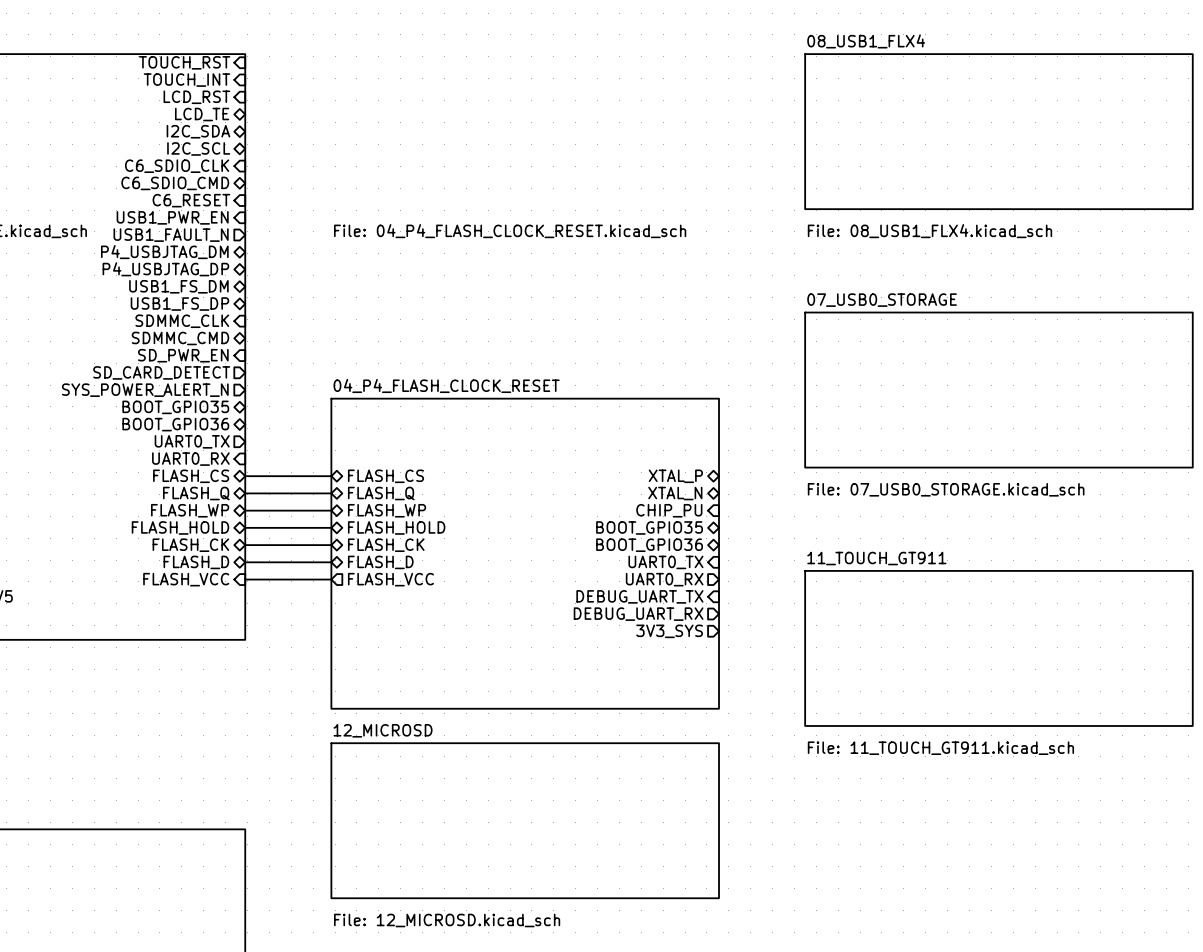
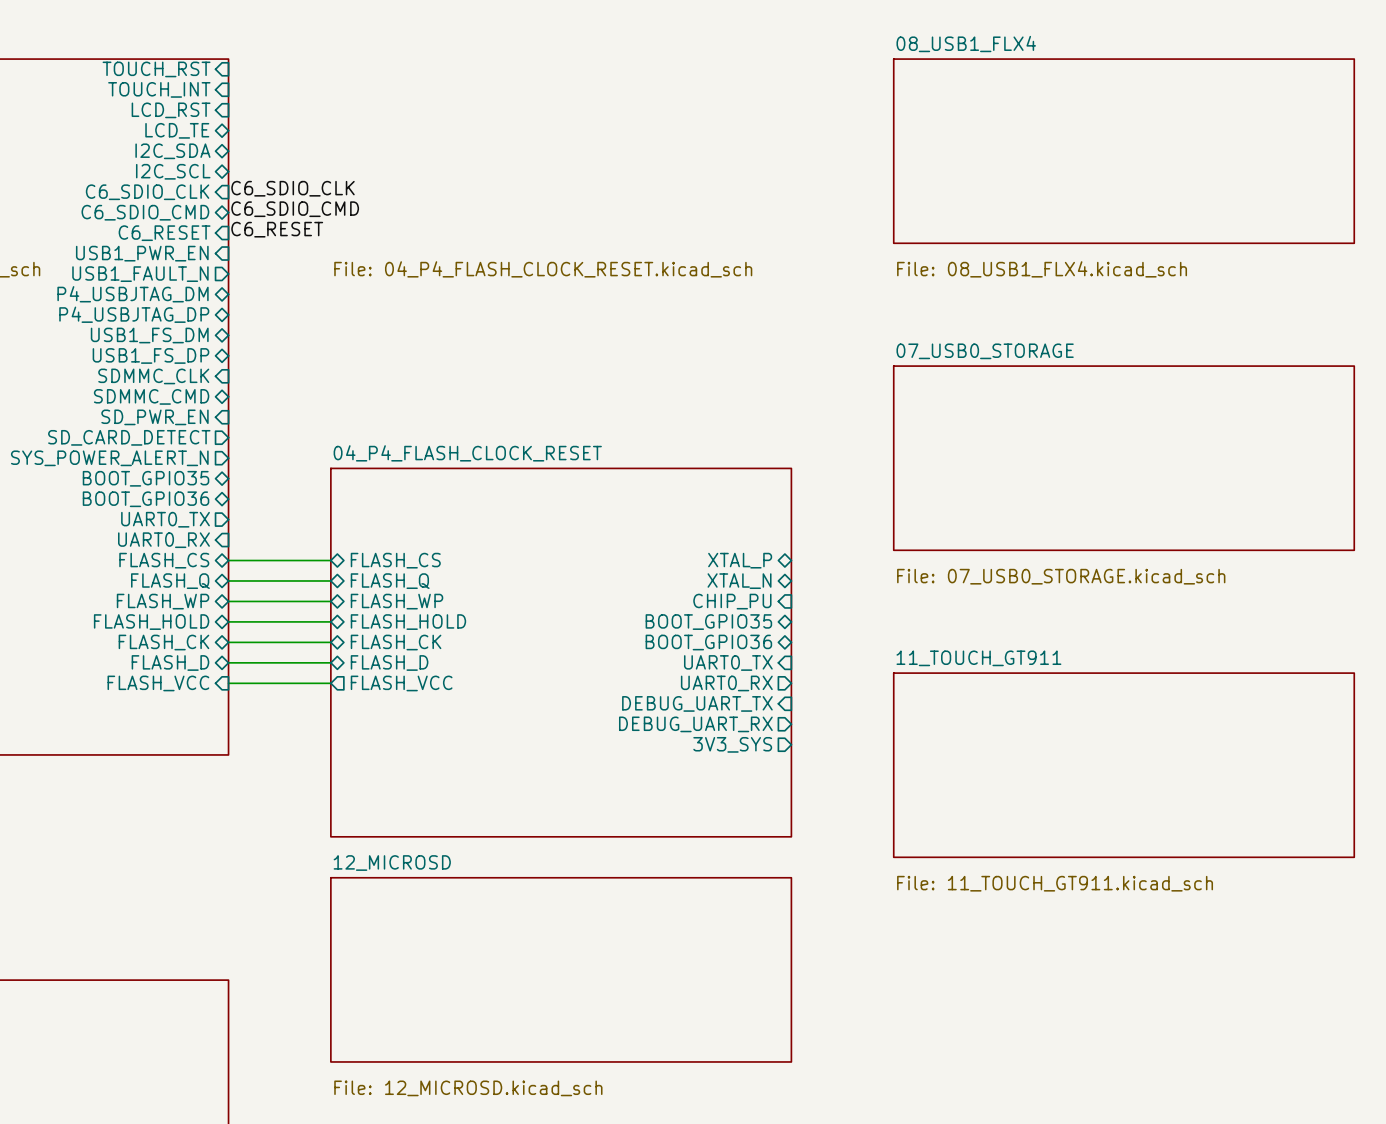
label: none -> C6_SDIO_CLK (293, 188)
label: none -> C6_SDIO_CMD (295, 209)
label: none -> C6_RESET (277, 229)

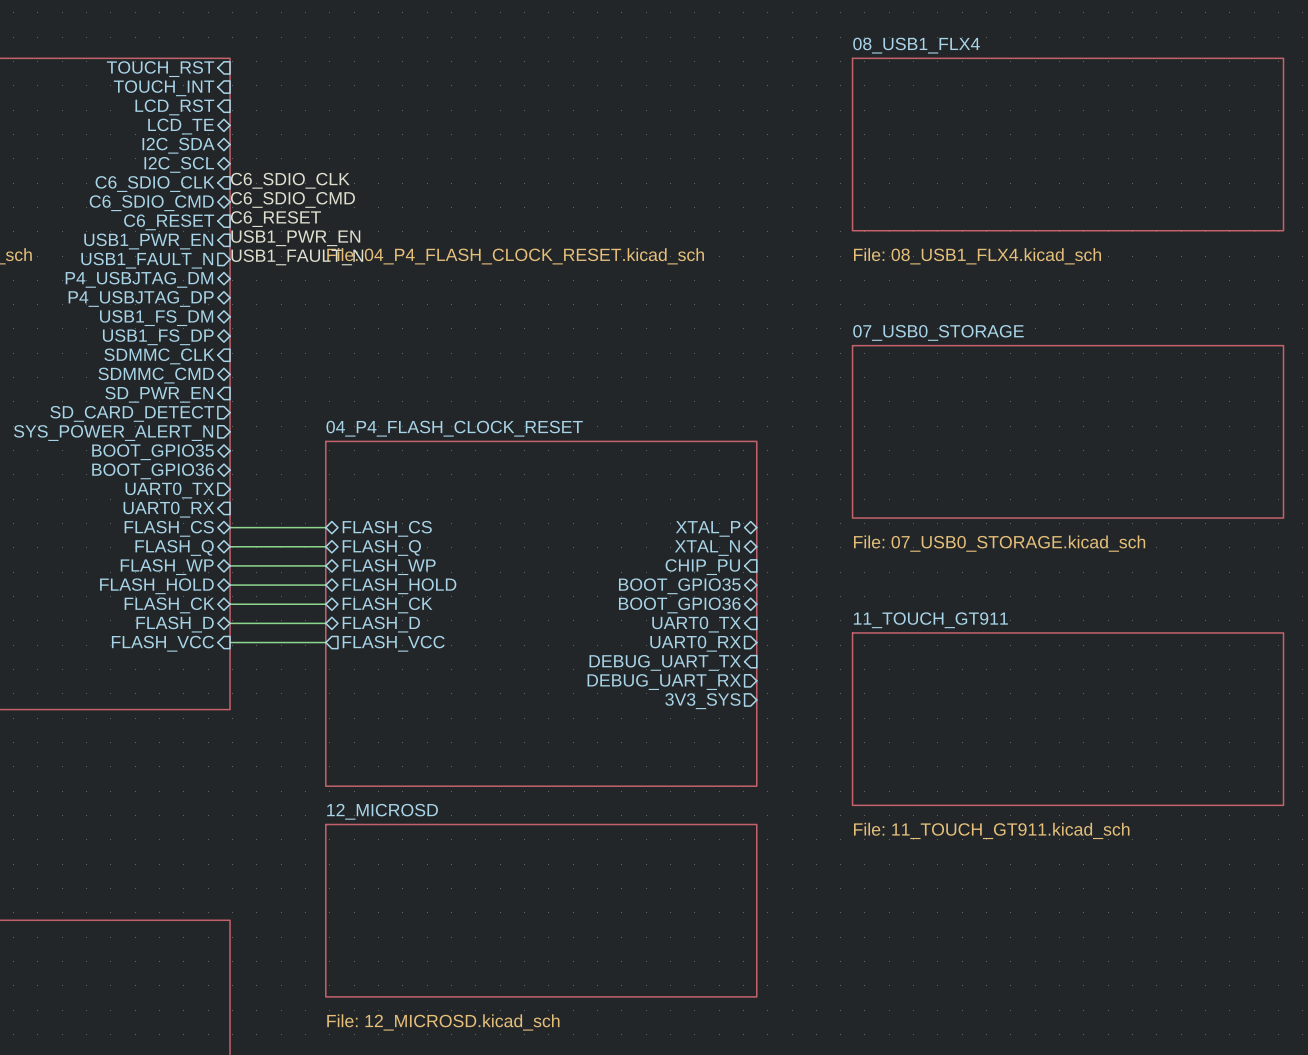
label: none -> USB1_PWR_EN (295, 238)
label: none -> USB1_FAULT_N (297, 257)

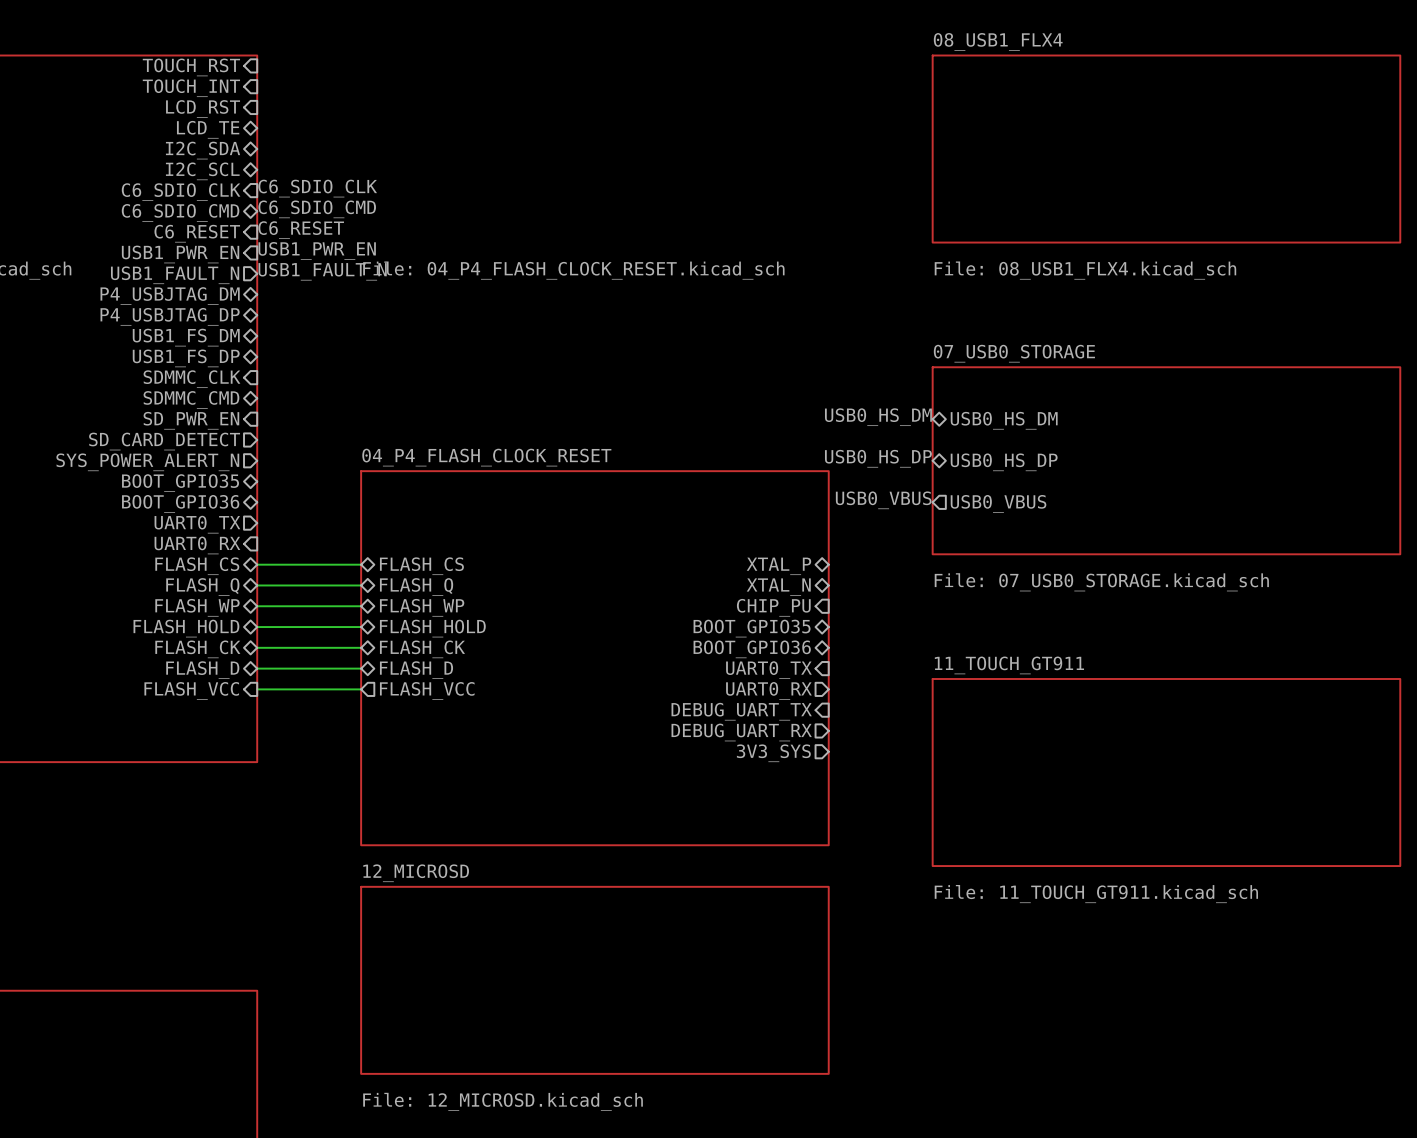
label: none -> USB0_HS_DM (878, 417)
sheet pin: none -> USB0_HS_DM (1004, 420)
label: none -> USB0_HS_DP (878, 458)
sheet pin: none -> USB0_HS_DP (1004, 462)
label: none -> USB0_VBUS (883, 500)
sheet pin: none -> USB0_VBUS (998, 503)

